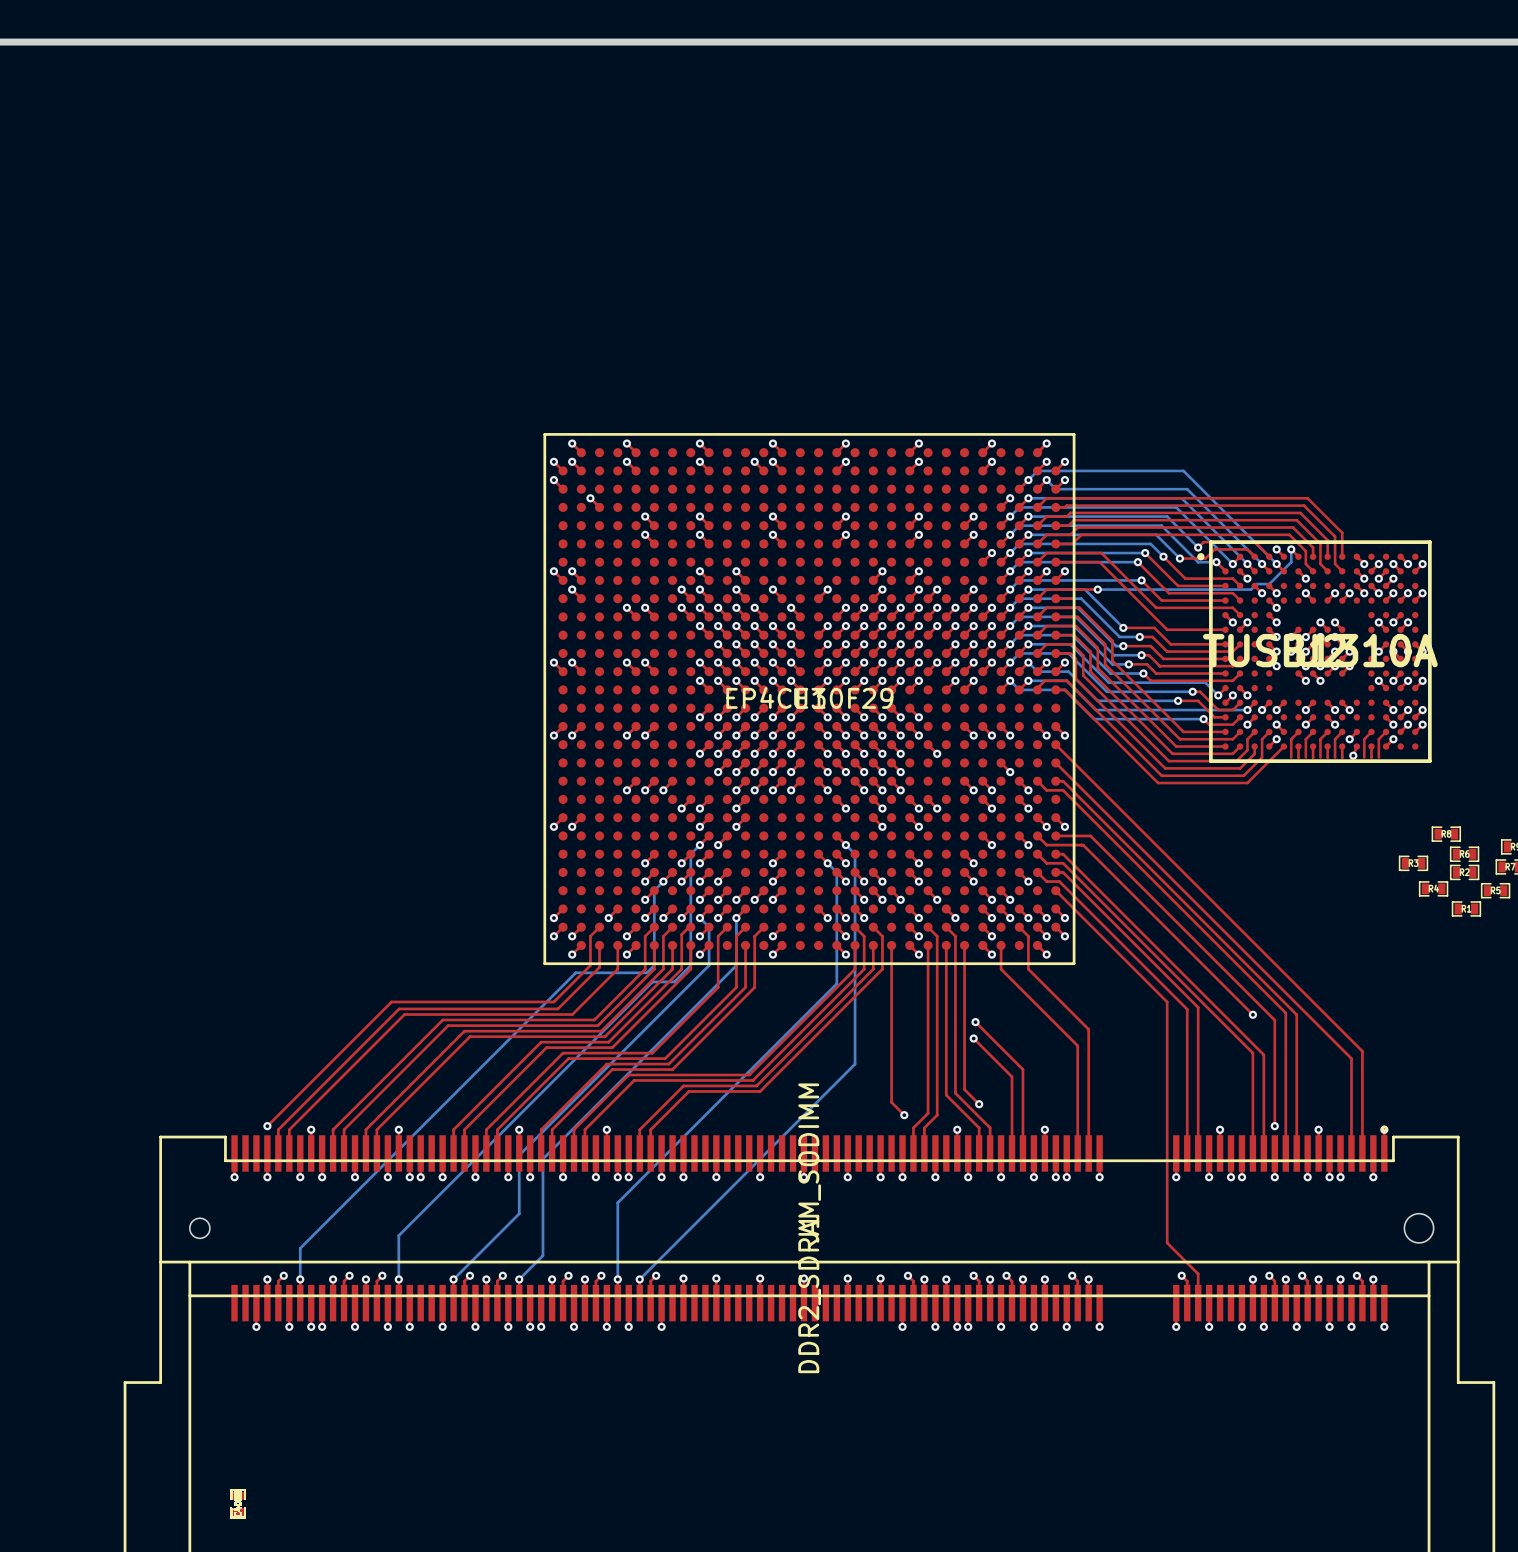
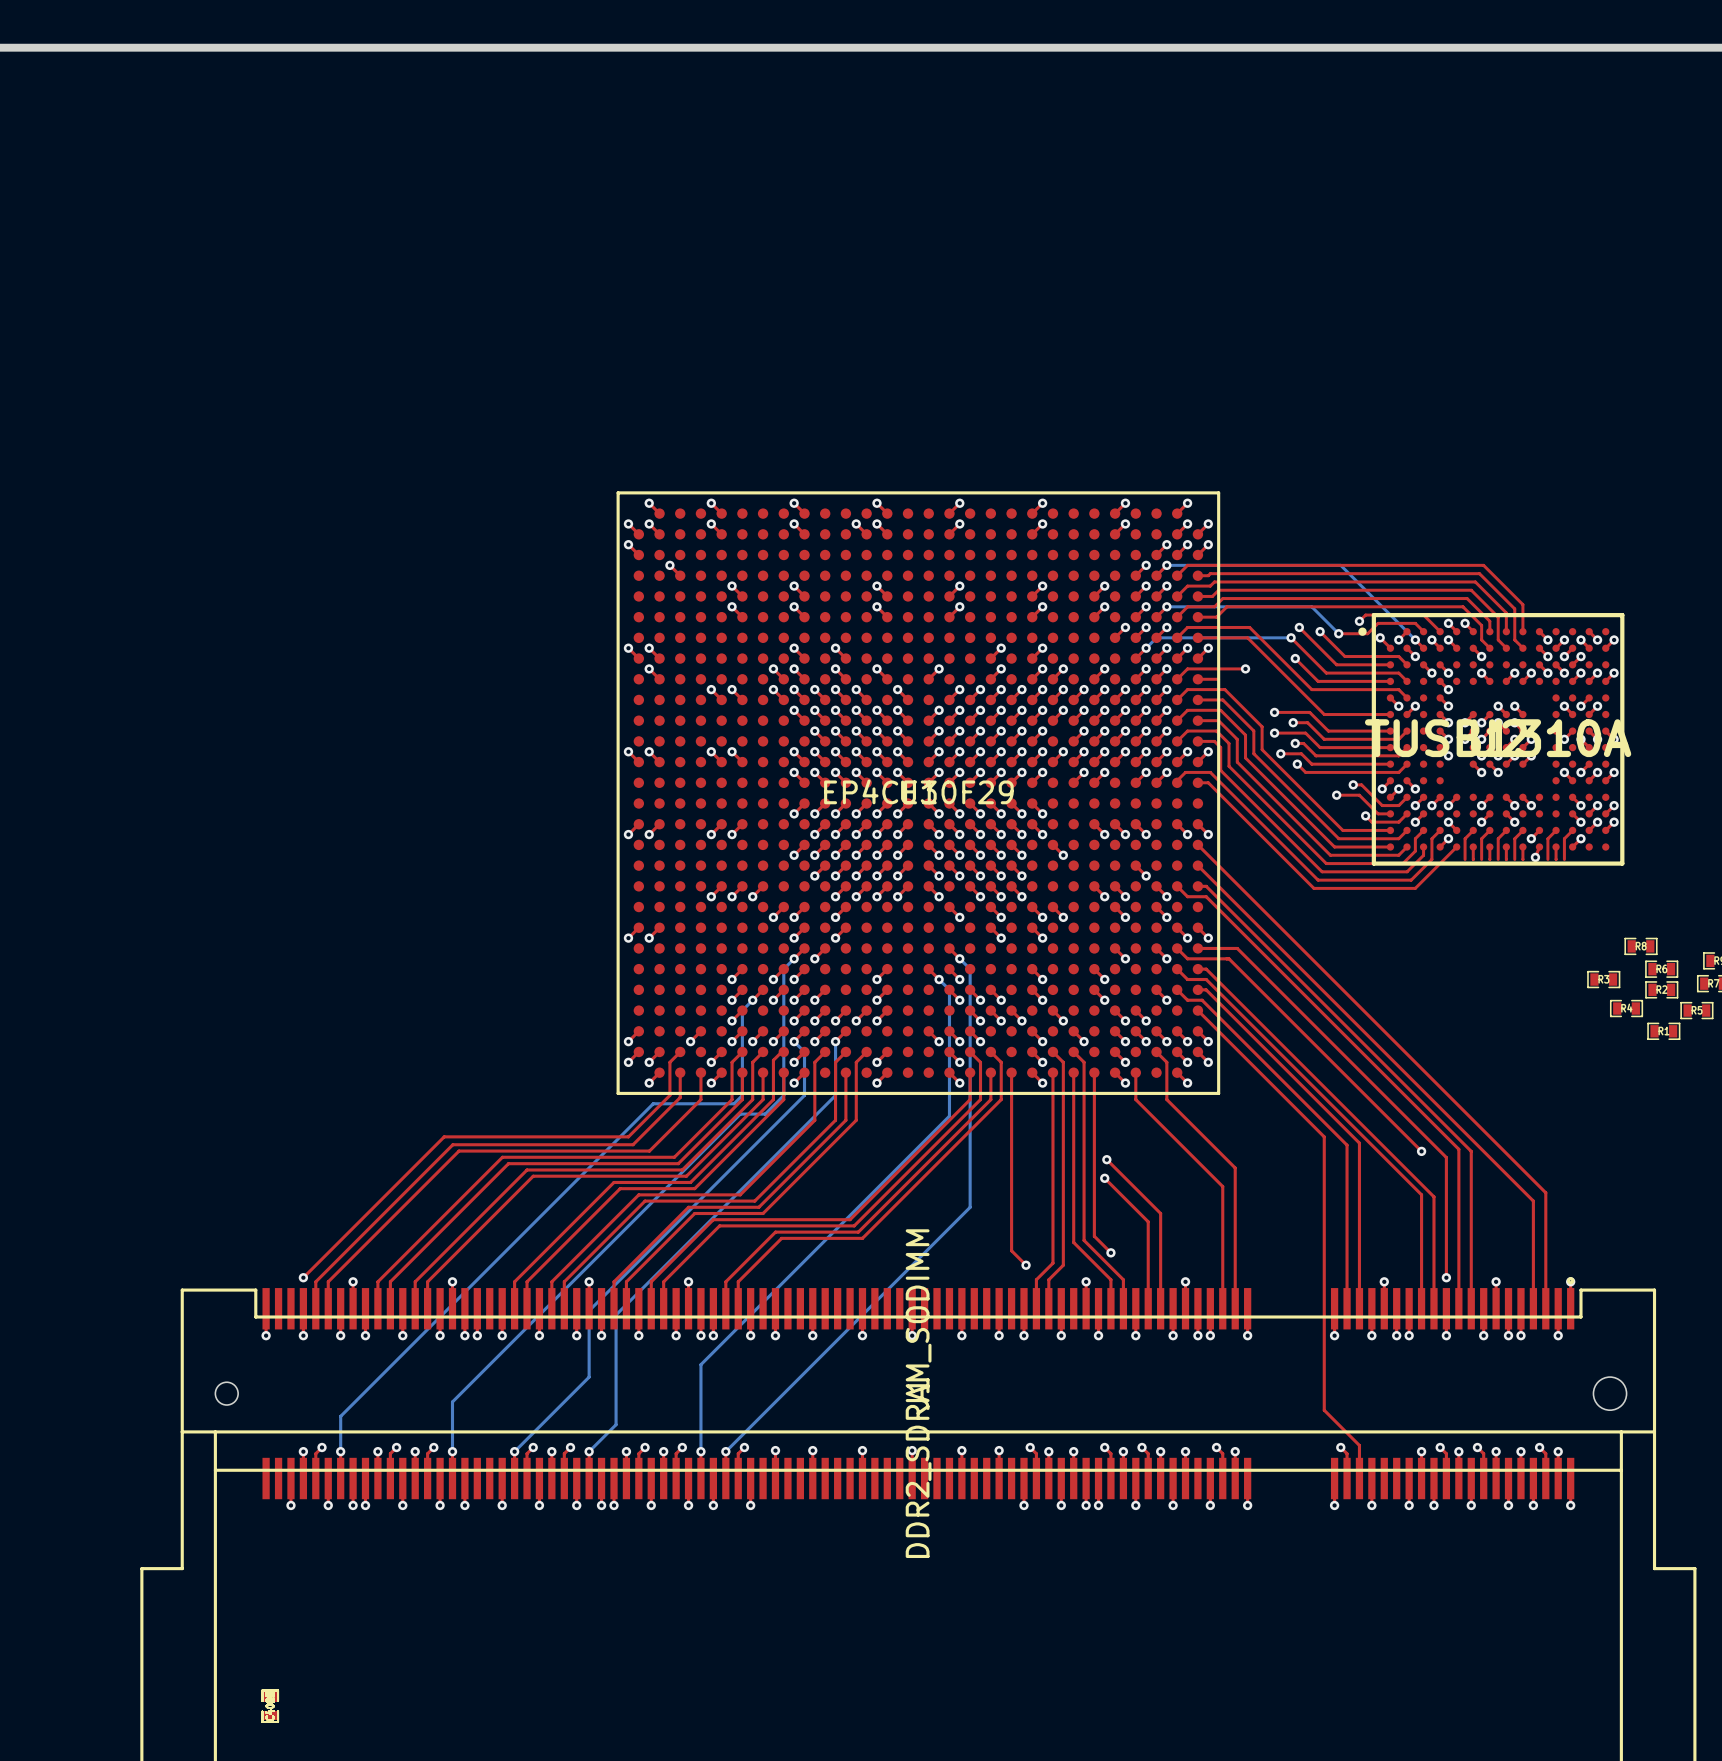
bottom track: (1028, 480) (1037, 470) (1183, 470) (1276, 564) -> none
bottom track: (1046, 480) (1055, 489) (1187, 489) (1262, 563) -> none
bottom track: (1010, 516) (1019, 507) (1176, 507) (1232, 564) -> none
bottom track: (1028, 516) (1167, 516) (1198, 547) -> none
bottom track: (1010, 534) (1019, 525) (1161, 525) (1198, 562) (1216, 562) -> none
bottom track: (1291, 549) (1291, 562) (1269, 584) (1256, 584) (1251, 589) (1097, 589) -> none
bottom track: (1010, 553) (1019, 543) (1150, 543) (1163, 556) -> none
bottom track: (1028, 553) (1145, 553) -> none
bottom track: (1141, 580) (1019, 580) (1010, 589) -> none
bottom track: (1028, 589) (1085, 589) (1123, 627) -> none
bottom track: (1010, 607) (1019, 598) (1081, 598) (1119, 636) (1139, 636) -> none
bottom track: (1028, 607) (1077, 607) (1116, 646) (1123, 646) -> none
bottom track: (1010, 626) (1019, 616) (1075, 616) (1114, 655) (1141, 655) -> none
bottom track: (1028, 626) (1074, 626) (1112, 664) (1128, 664) -> none
bottom track: (1010, 644) (1019, 635) (1072, 635) (1110, 673) (1143, 673) -> none
bottom track: (1028, 644) (1070, 644) (1108, 682) (1205, 682) (1218, 695) -> none
bottom track: (1010, 662) (1019, 653) (1068, 653) (1106, 691) (1192, 691) -> none
bottom track: (1028, 662) (1037, 671) (1068, 671) (1097, 700) (1178, 700) -> none
bottom track: (1010, 680) (1019, 689) (1064, 689) (1094, 719) (1203, 719) -> none
bottom track: (1028, 680) (1066, 680) (1096, 710) (1247, 710) -> none

